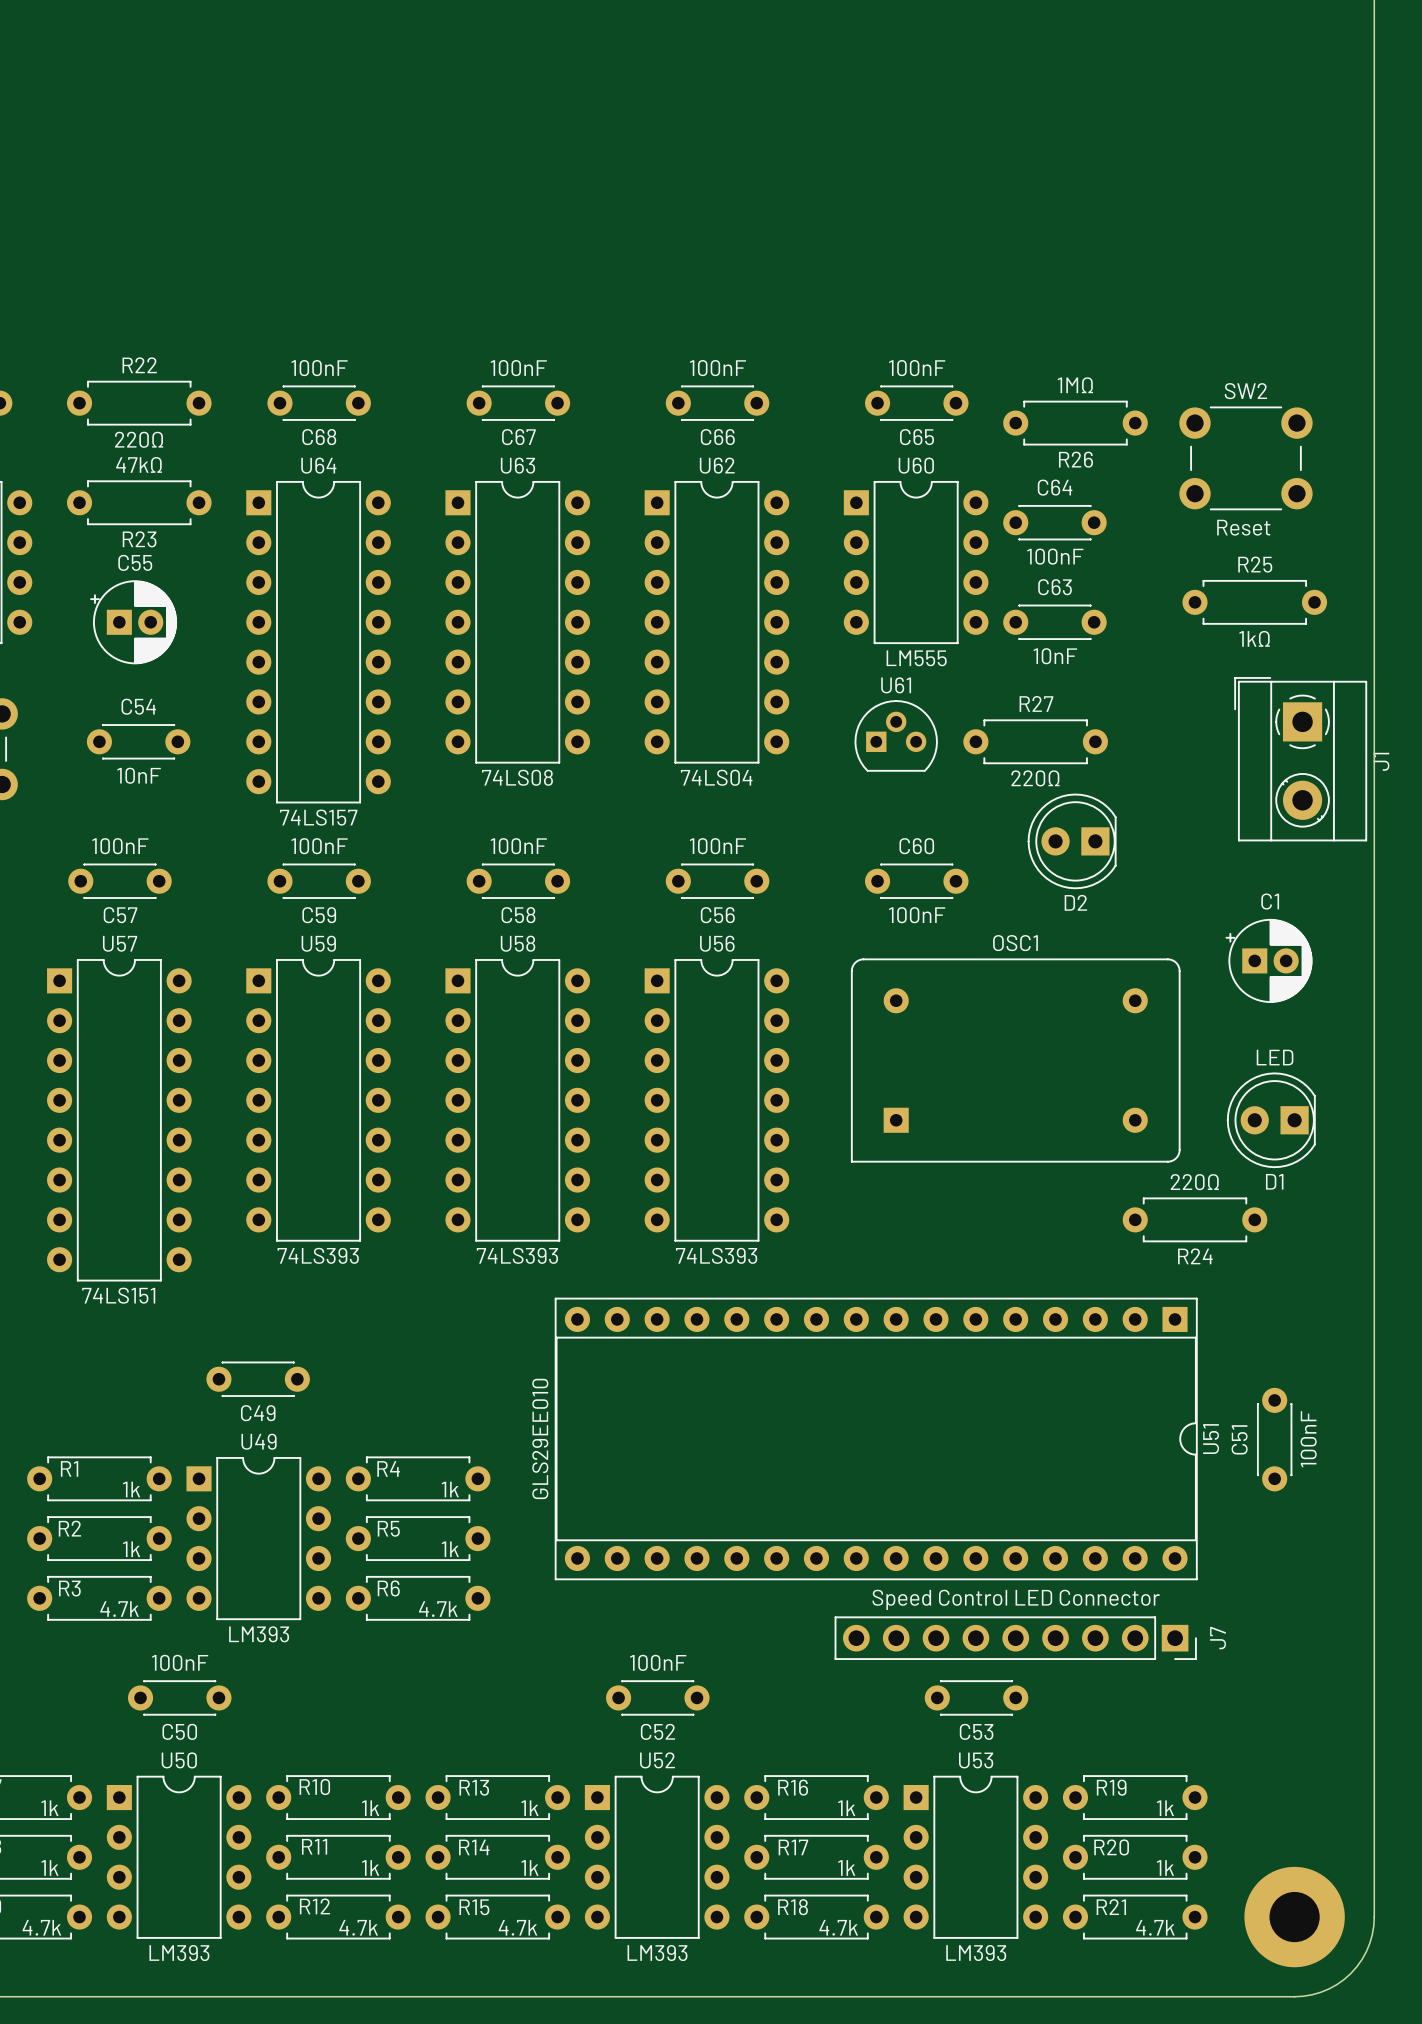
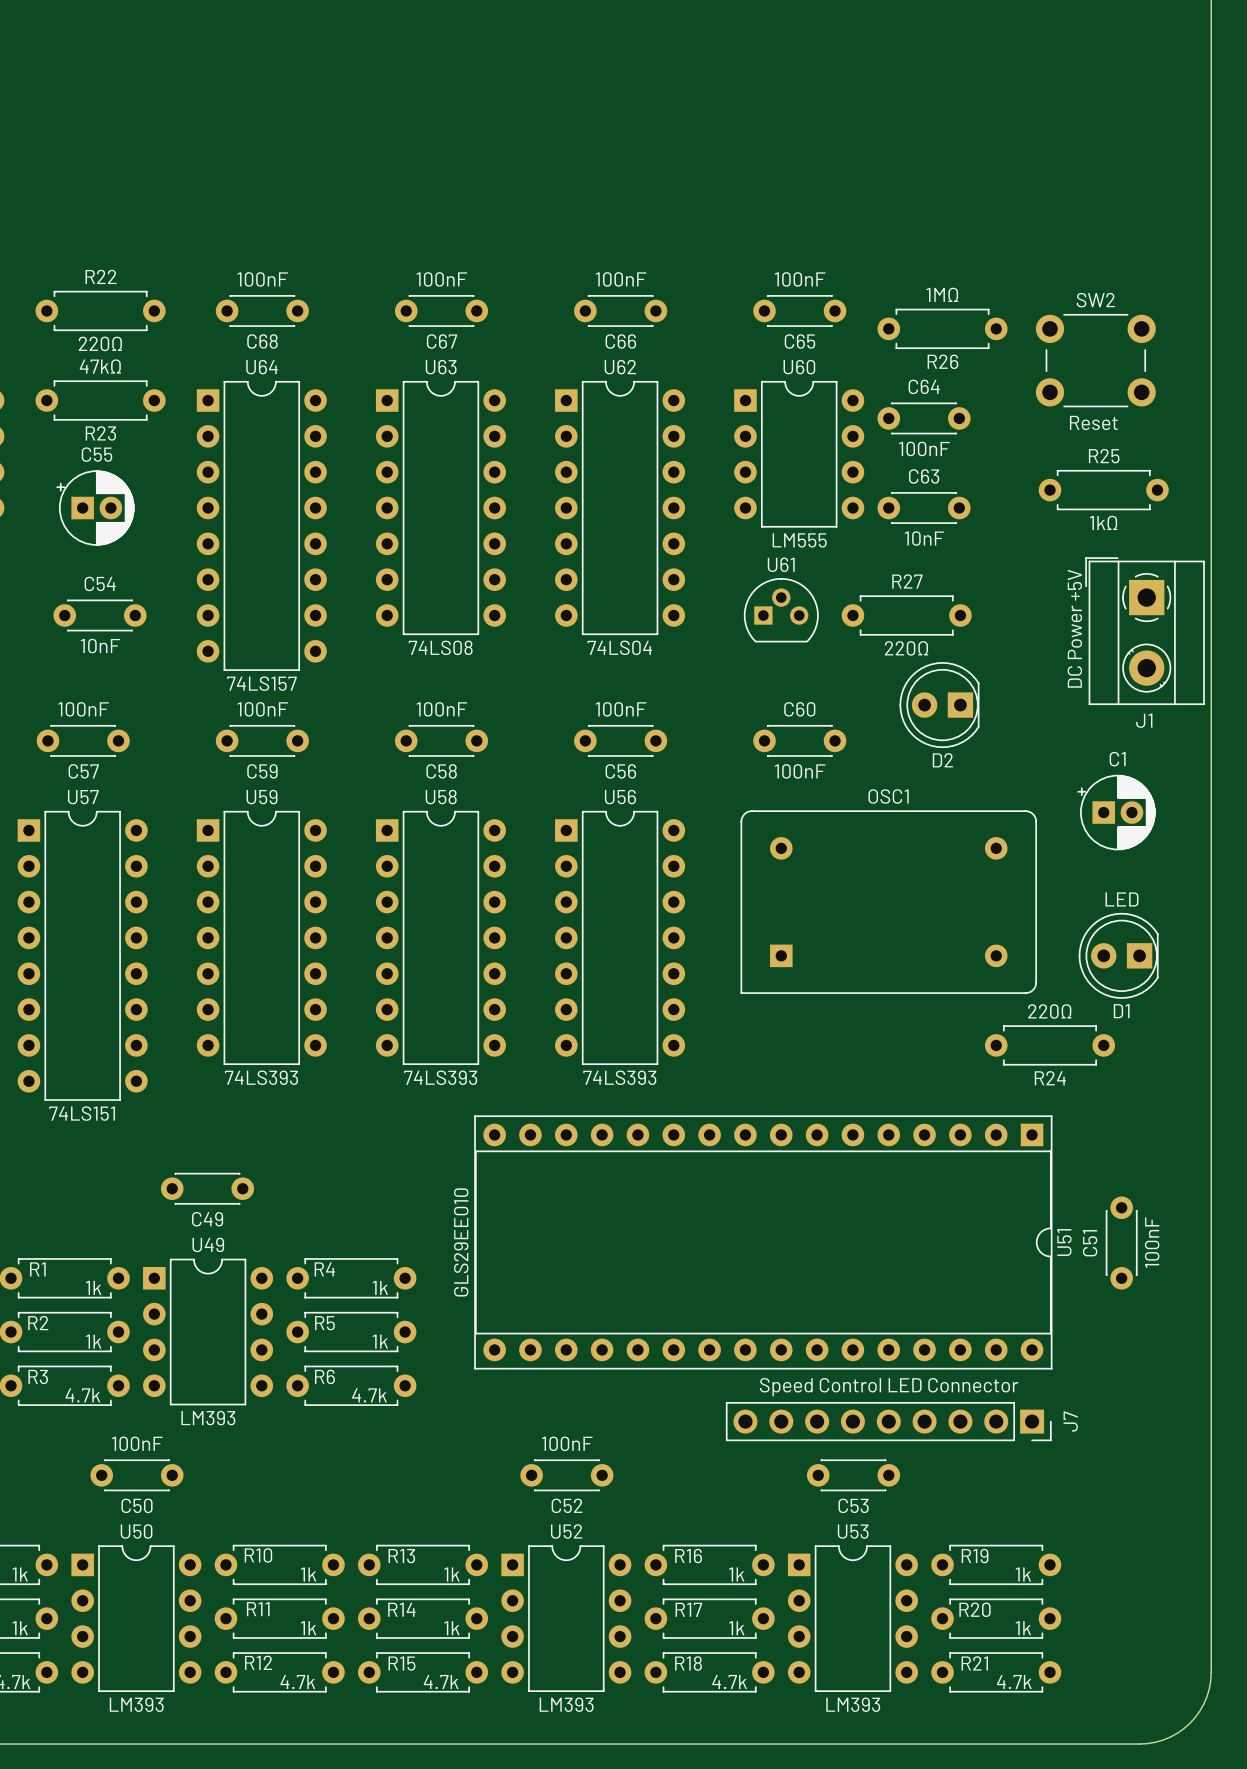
J1 value: none -> DC Power +5V (1074, 628)
J1 name rotation: 0° (1381, 761) -> 90° clockwise (1144, 720)
J1 name position: J1 (1381, 761) -> J1 (1144, 720)
part: (1294, 1917) -> none

